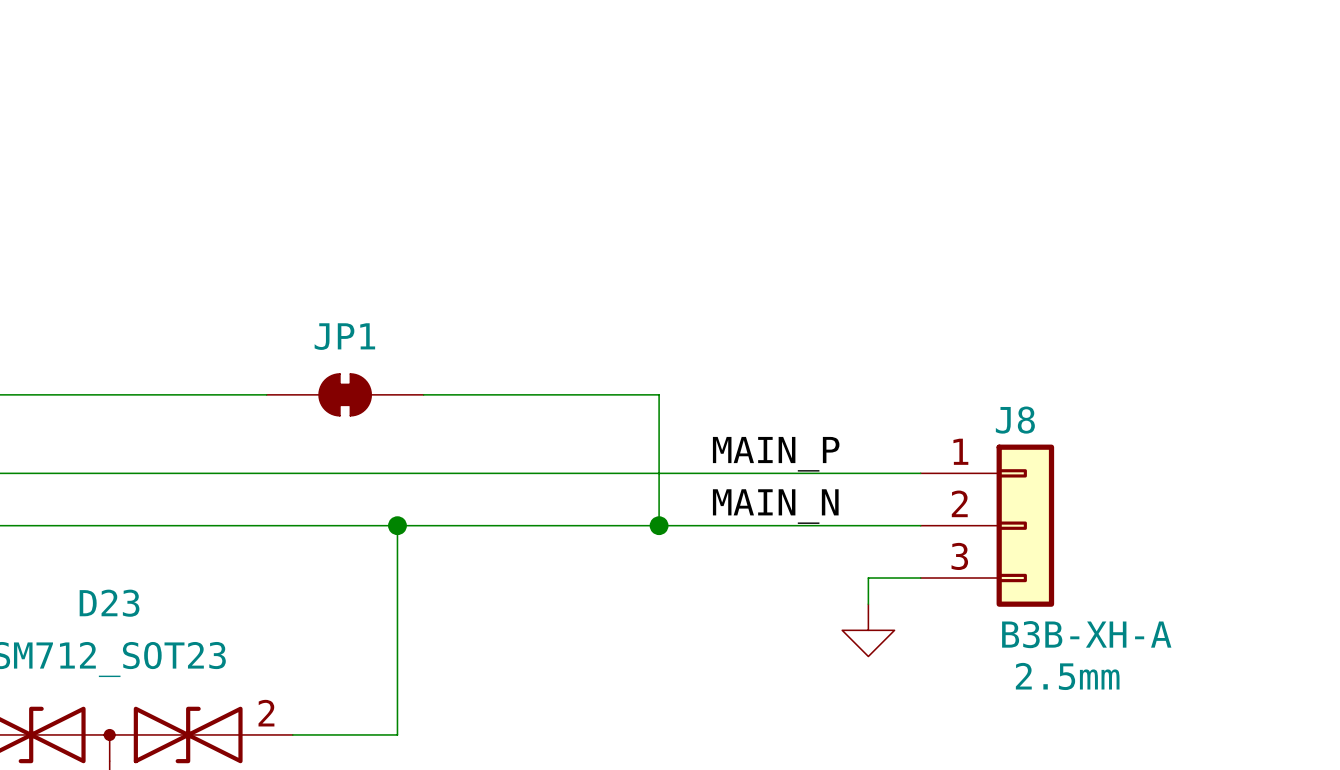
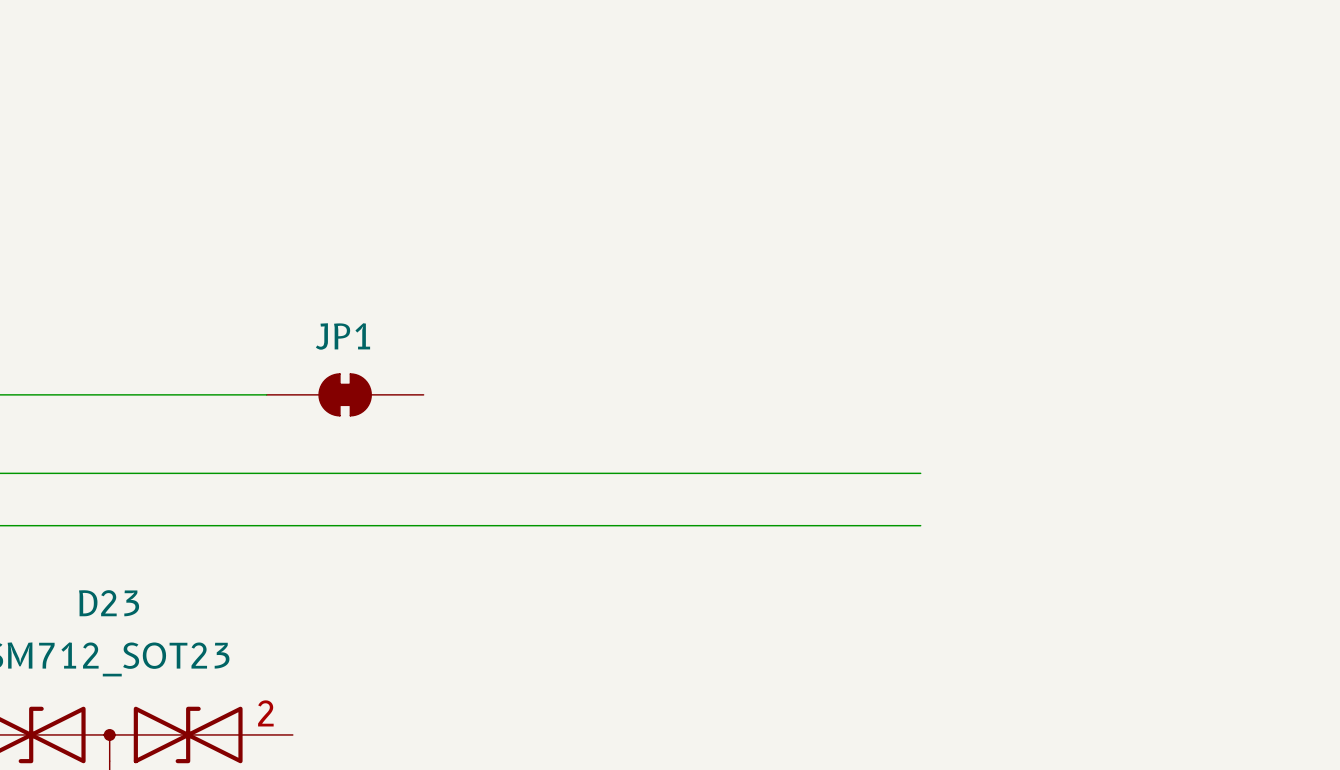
wire: (423, 394) (659, 394) (659, 525) -> none
label: MAIN_P (776, 454) -> none
label: MAIN_N (775, 506) -> none
wire: (397, 525) (397, 734) (292, 734) -> none
junction: (397, 525) -> none
junction: (659, 525) -> none
J8: B3B-XH-A (987, 525) -> none
wire: (920, 578) (868, 578) (868, 604) -> none
power symbol: (868, 630) -> none

